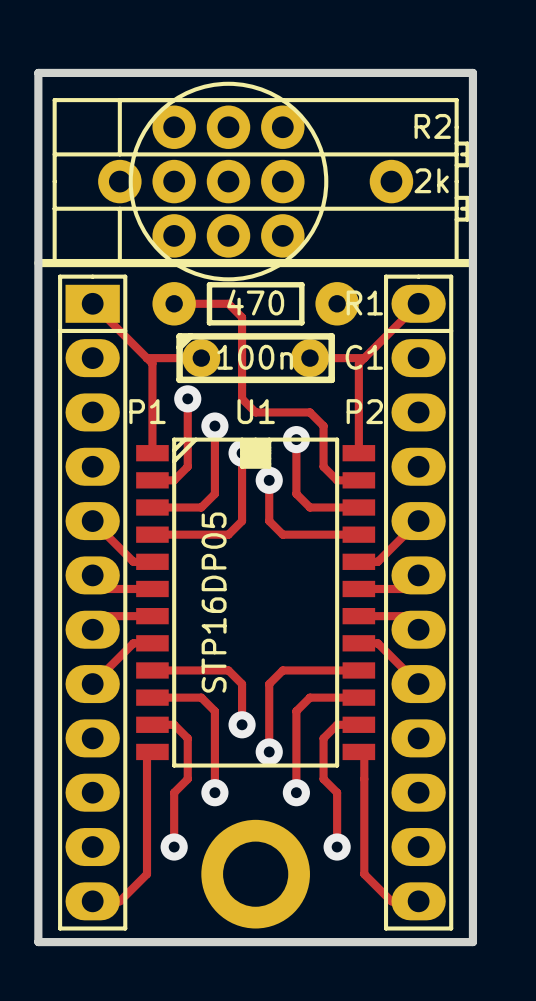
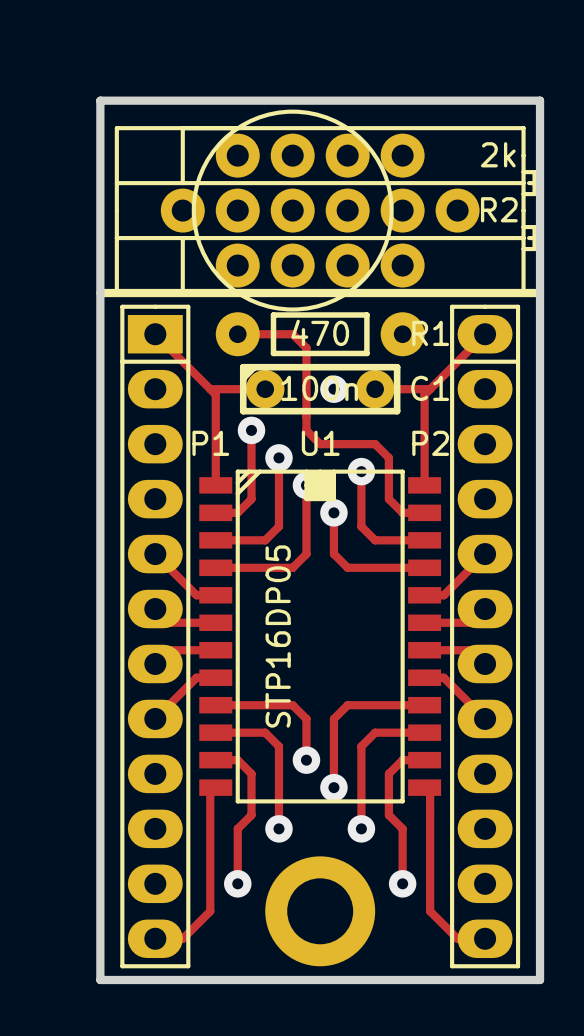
R2 footprint: [52, 81, 470, 282] -> [114, 109, 537, 312]
R2 name position: R2 (432, 126) -> R2 (499, 209)
R2 value position: 2k (431, 180) -> 2k (498, 154)
via: none -> (333, 389)

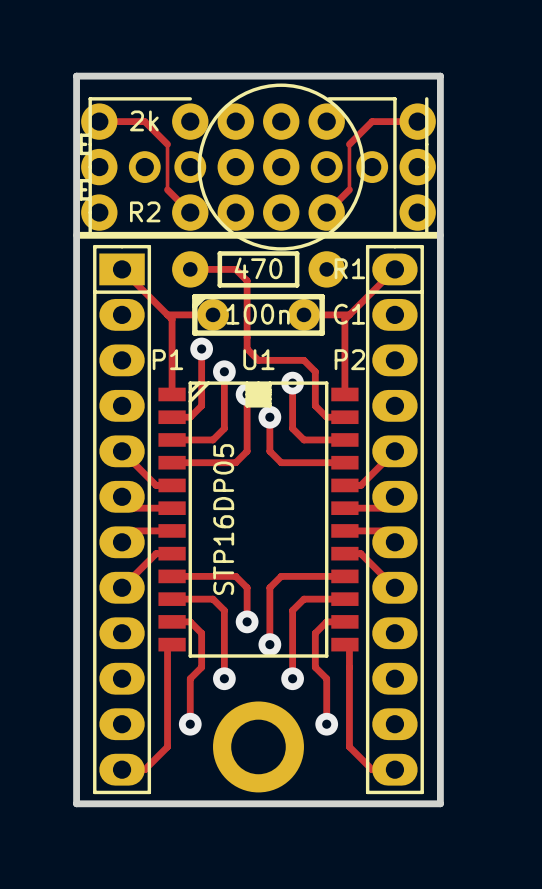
R2 footprint: [114, 109, 537, 312] -> [79, 83, 436, 251]
R2 value position: 2k (498, 154) -> 2k (144, 120)
track: none -> (99, 121) (144, 121) (167, 144) (167, 189) (190, 212)
track: none -> (417, 121) (372, 121) (349, 144) (349, 189) (326, 212)
R2 name position: R2 (499, 209) -> R2 (145, 211)
via: (333, 389) -> none

